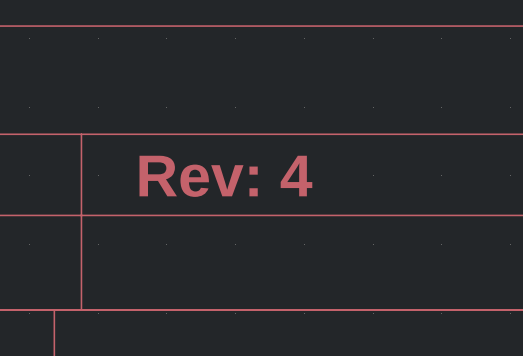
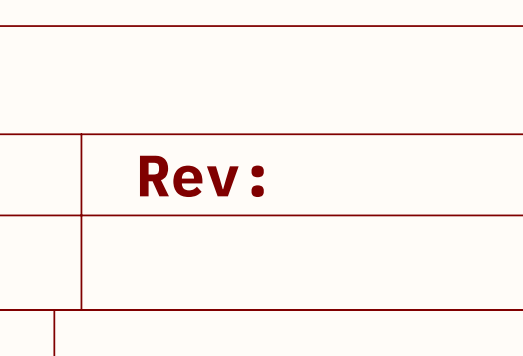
title block: Rev: 4 (225, 176) -> Rev: (201, 176)

